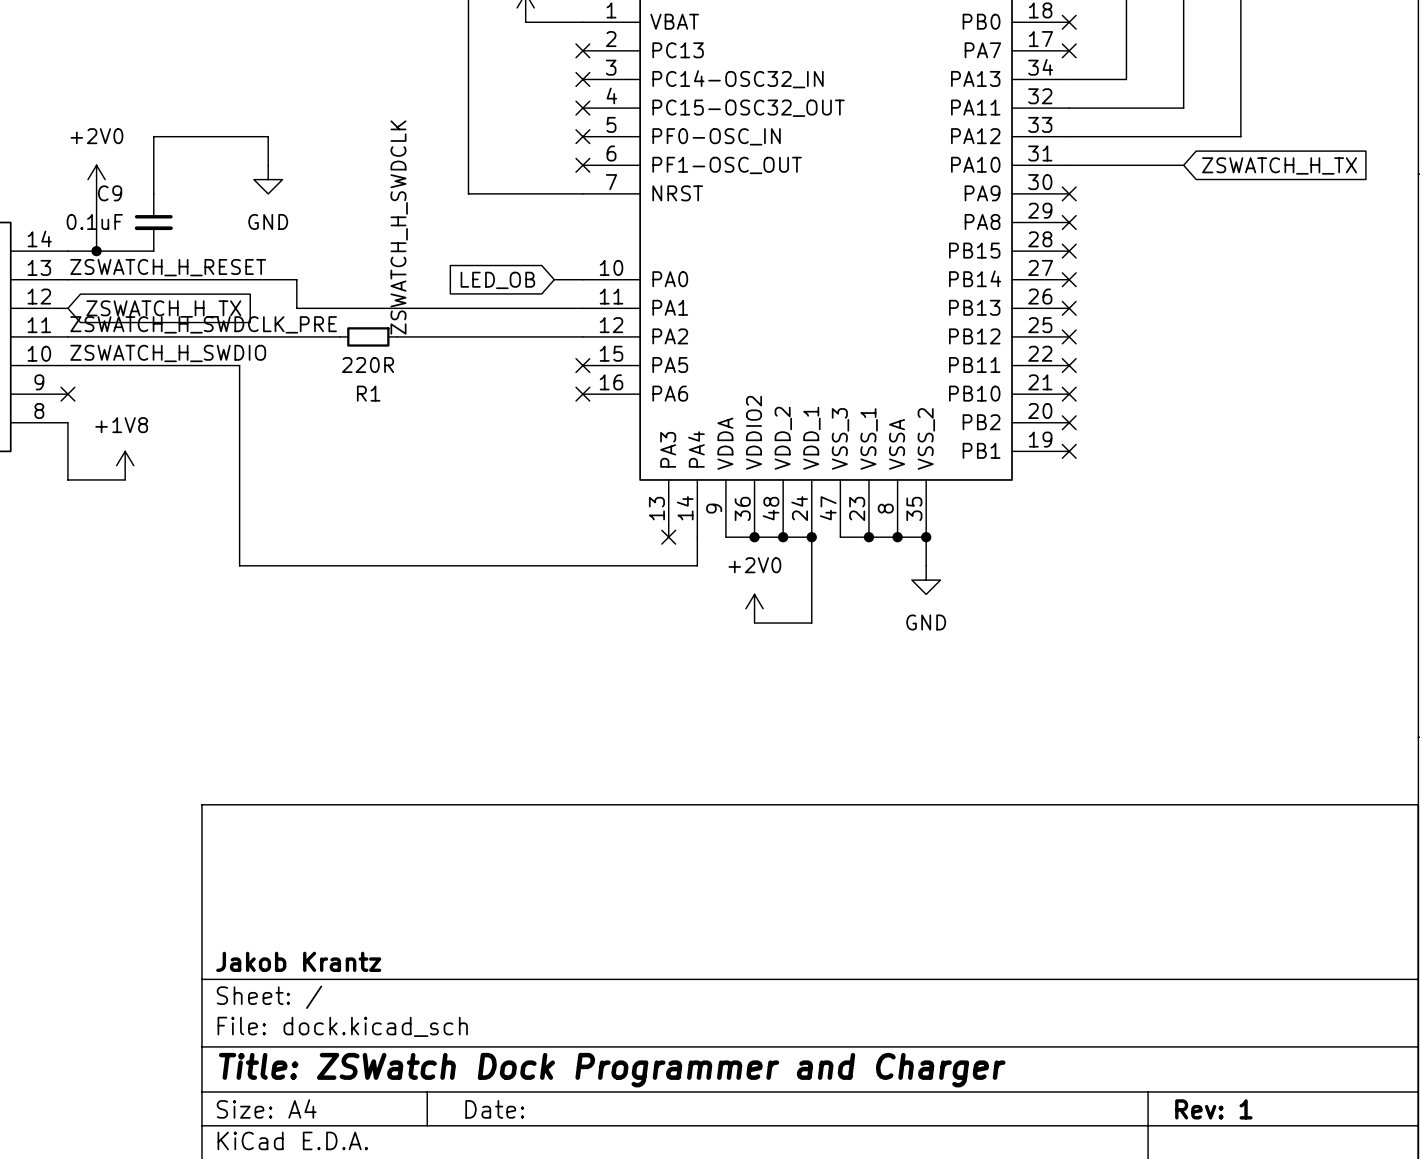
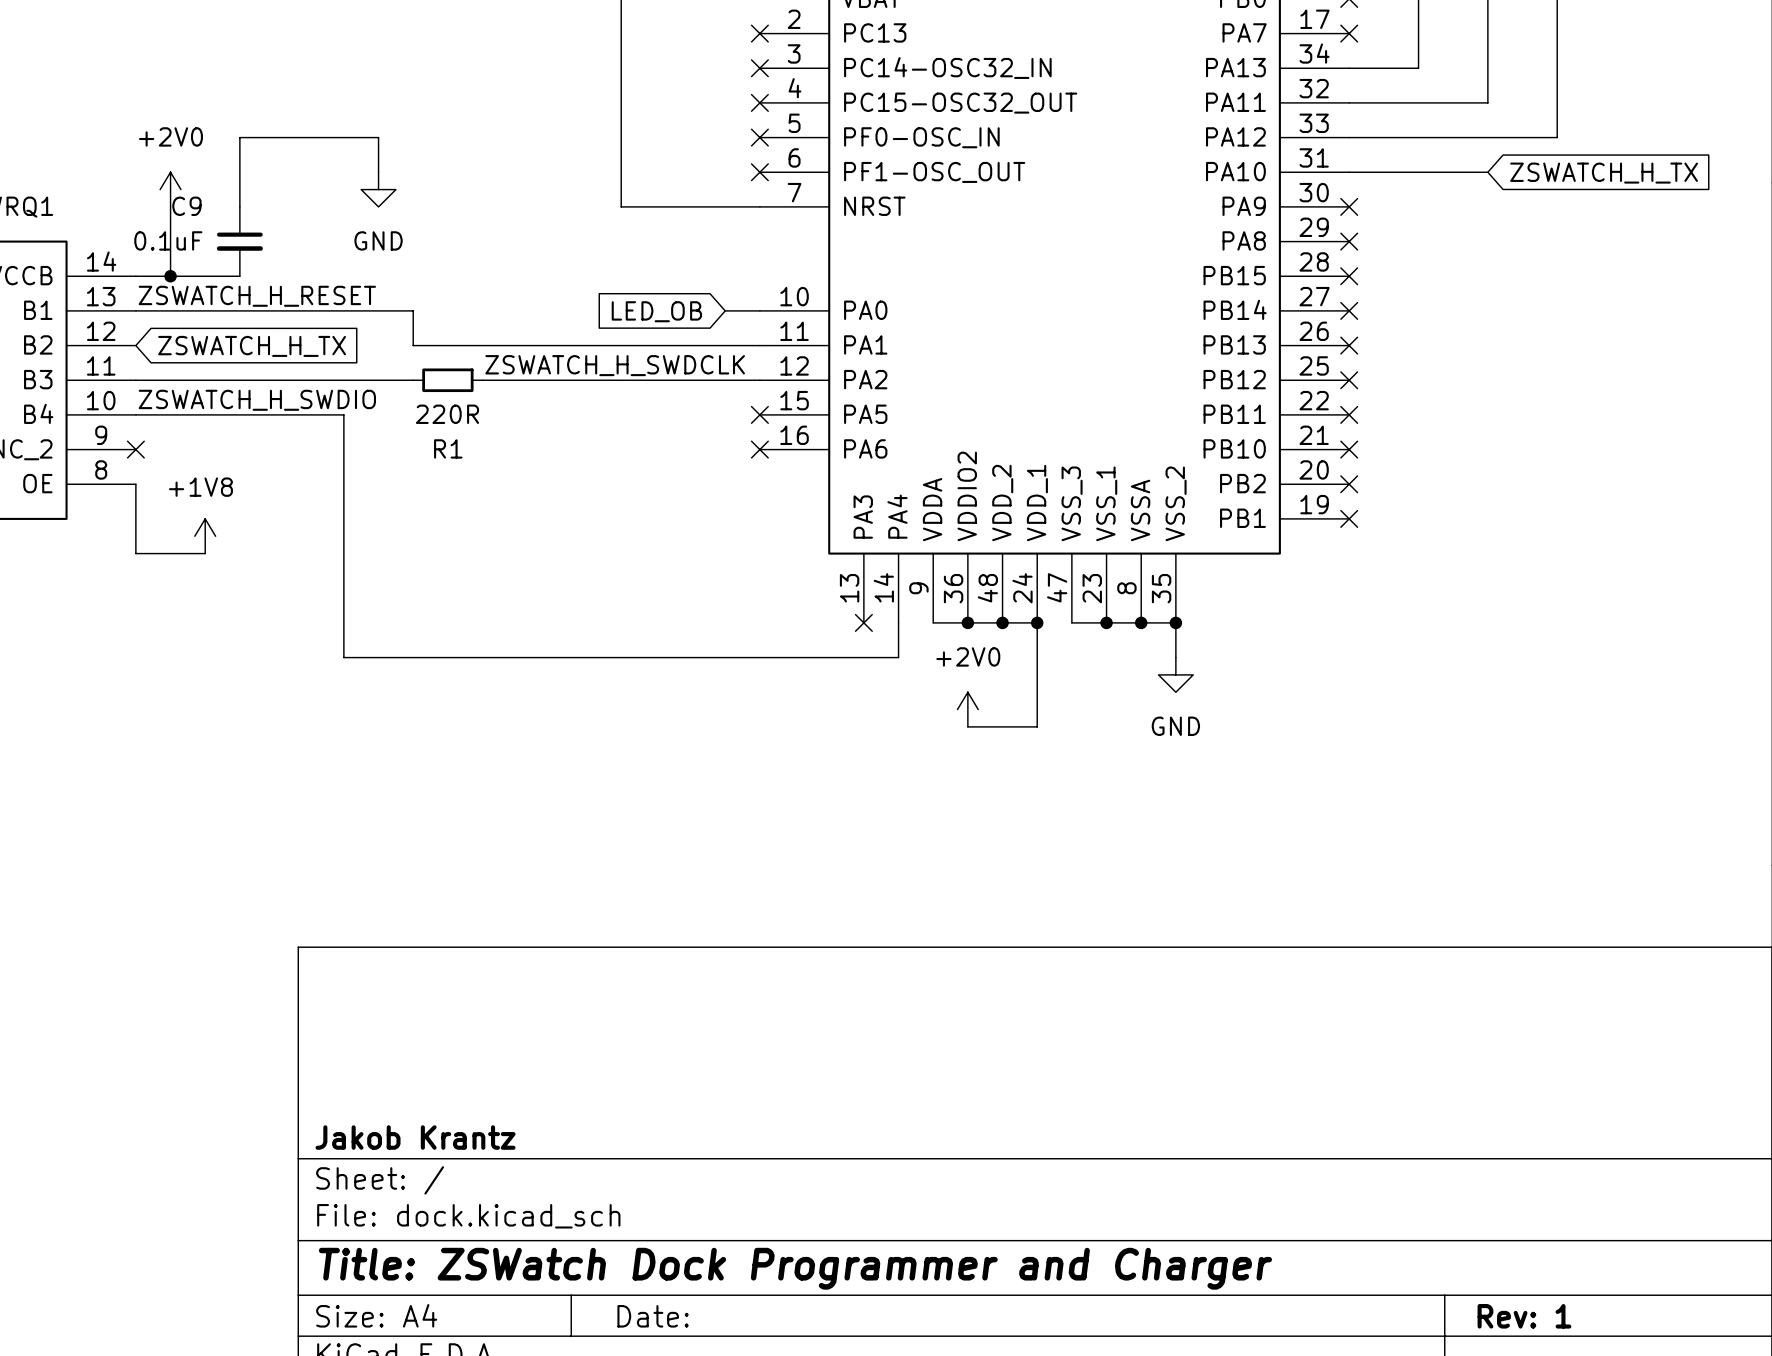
label rotation: 0° (399, 227) -> 90° clockwise (615, 365)
label: ZSWATCH_H_SWDCLK_PRE (203, 324) -> none
wire: (296, 336) (339, 336) -> (482, 380) (534, 380)
R1 position: (368, 336) -> (447, 380)

